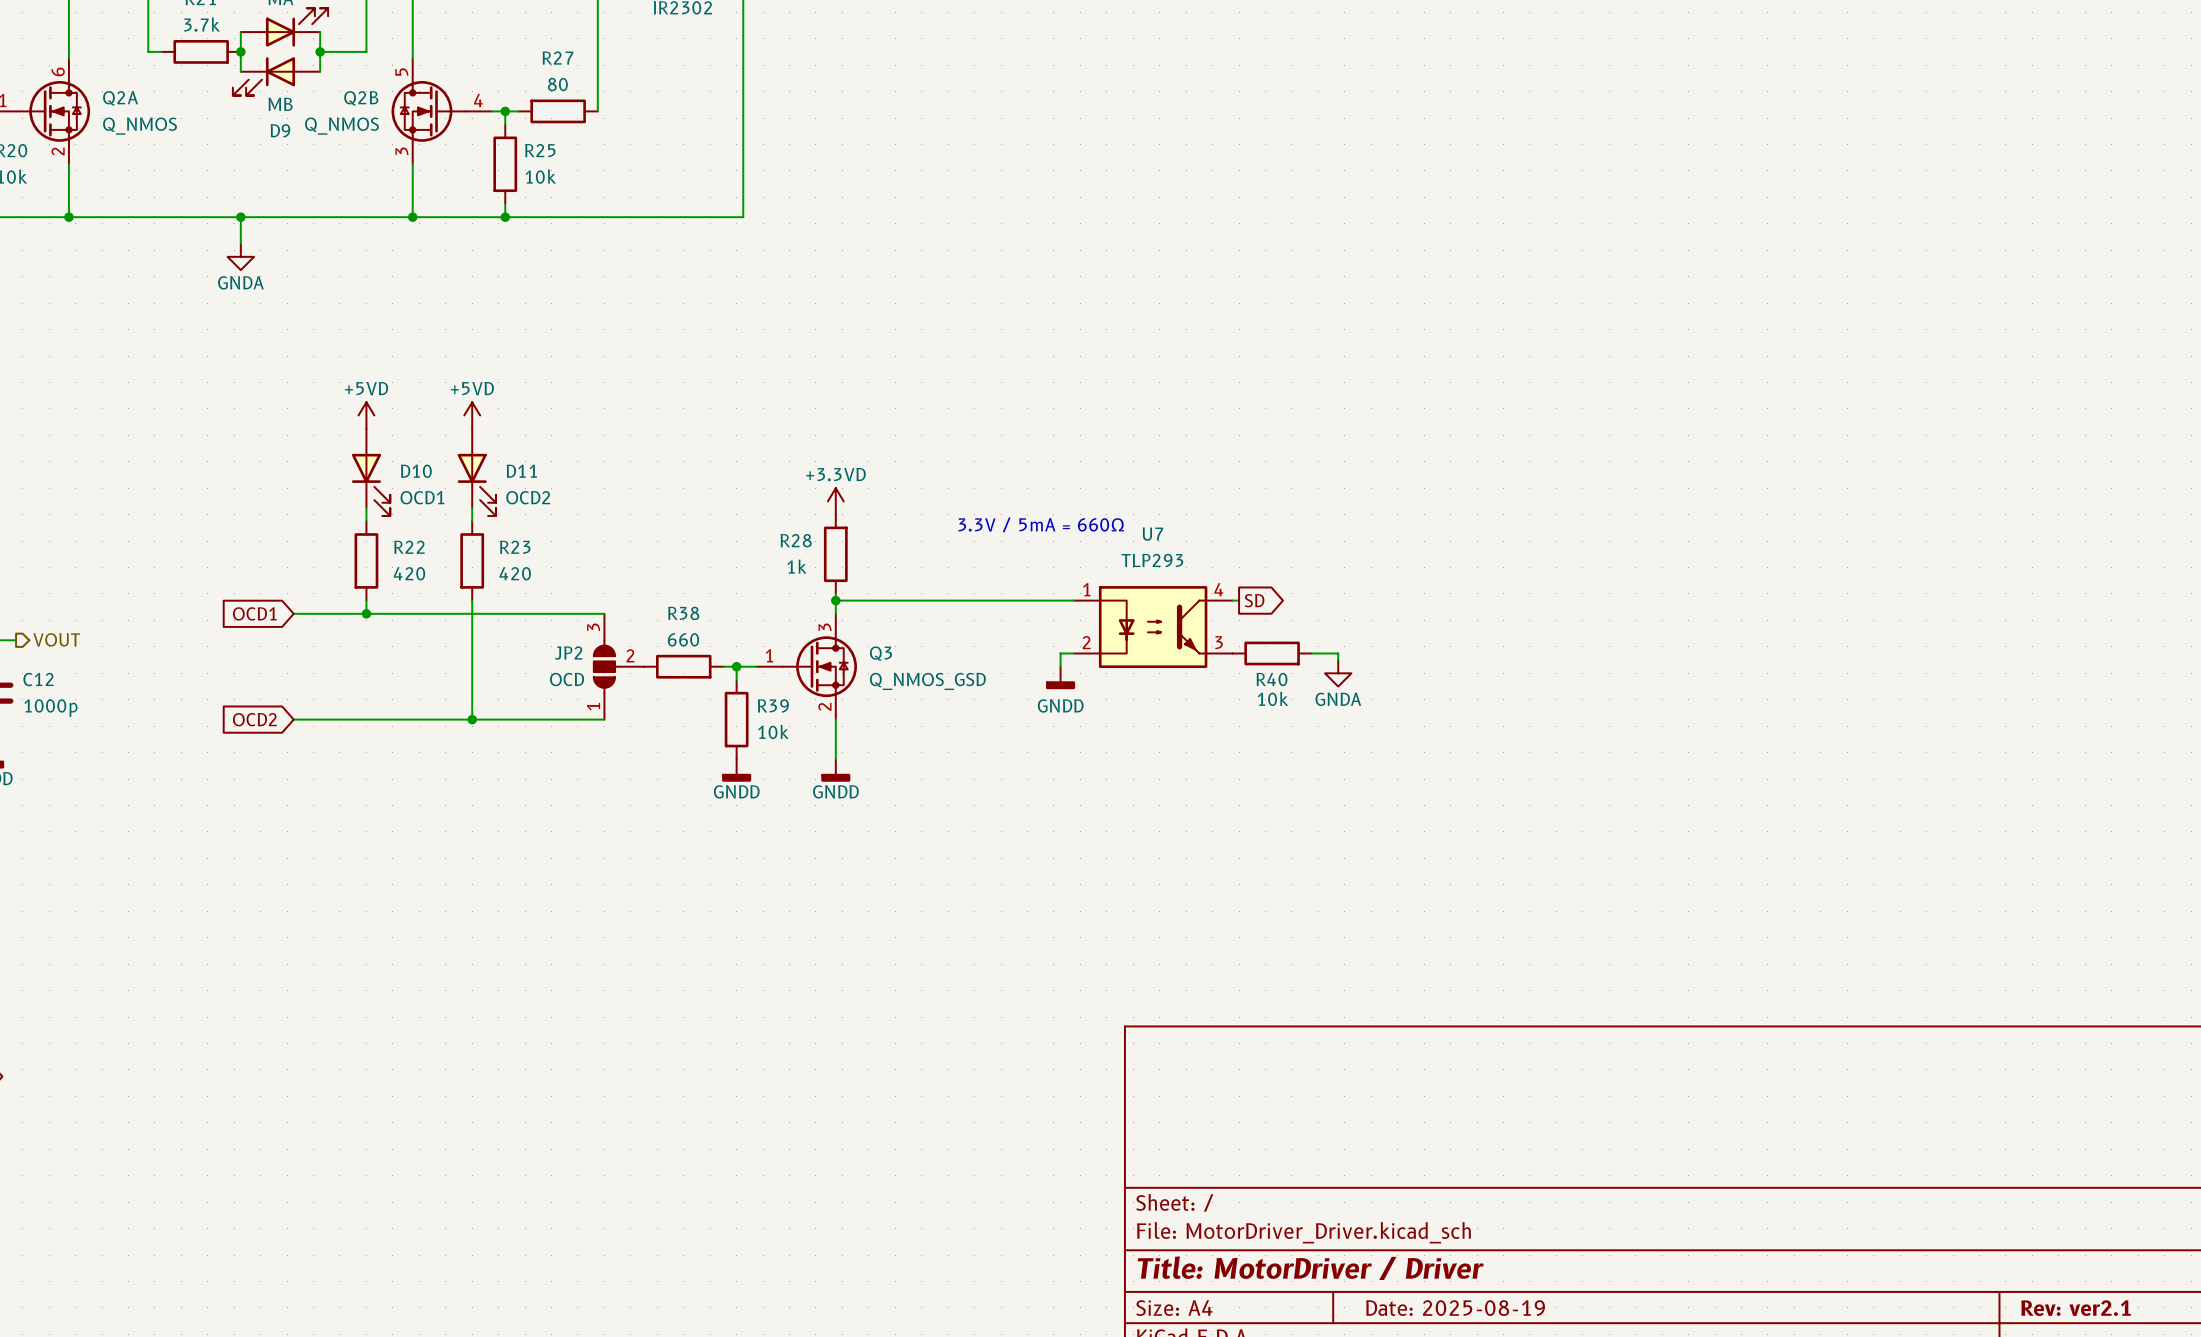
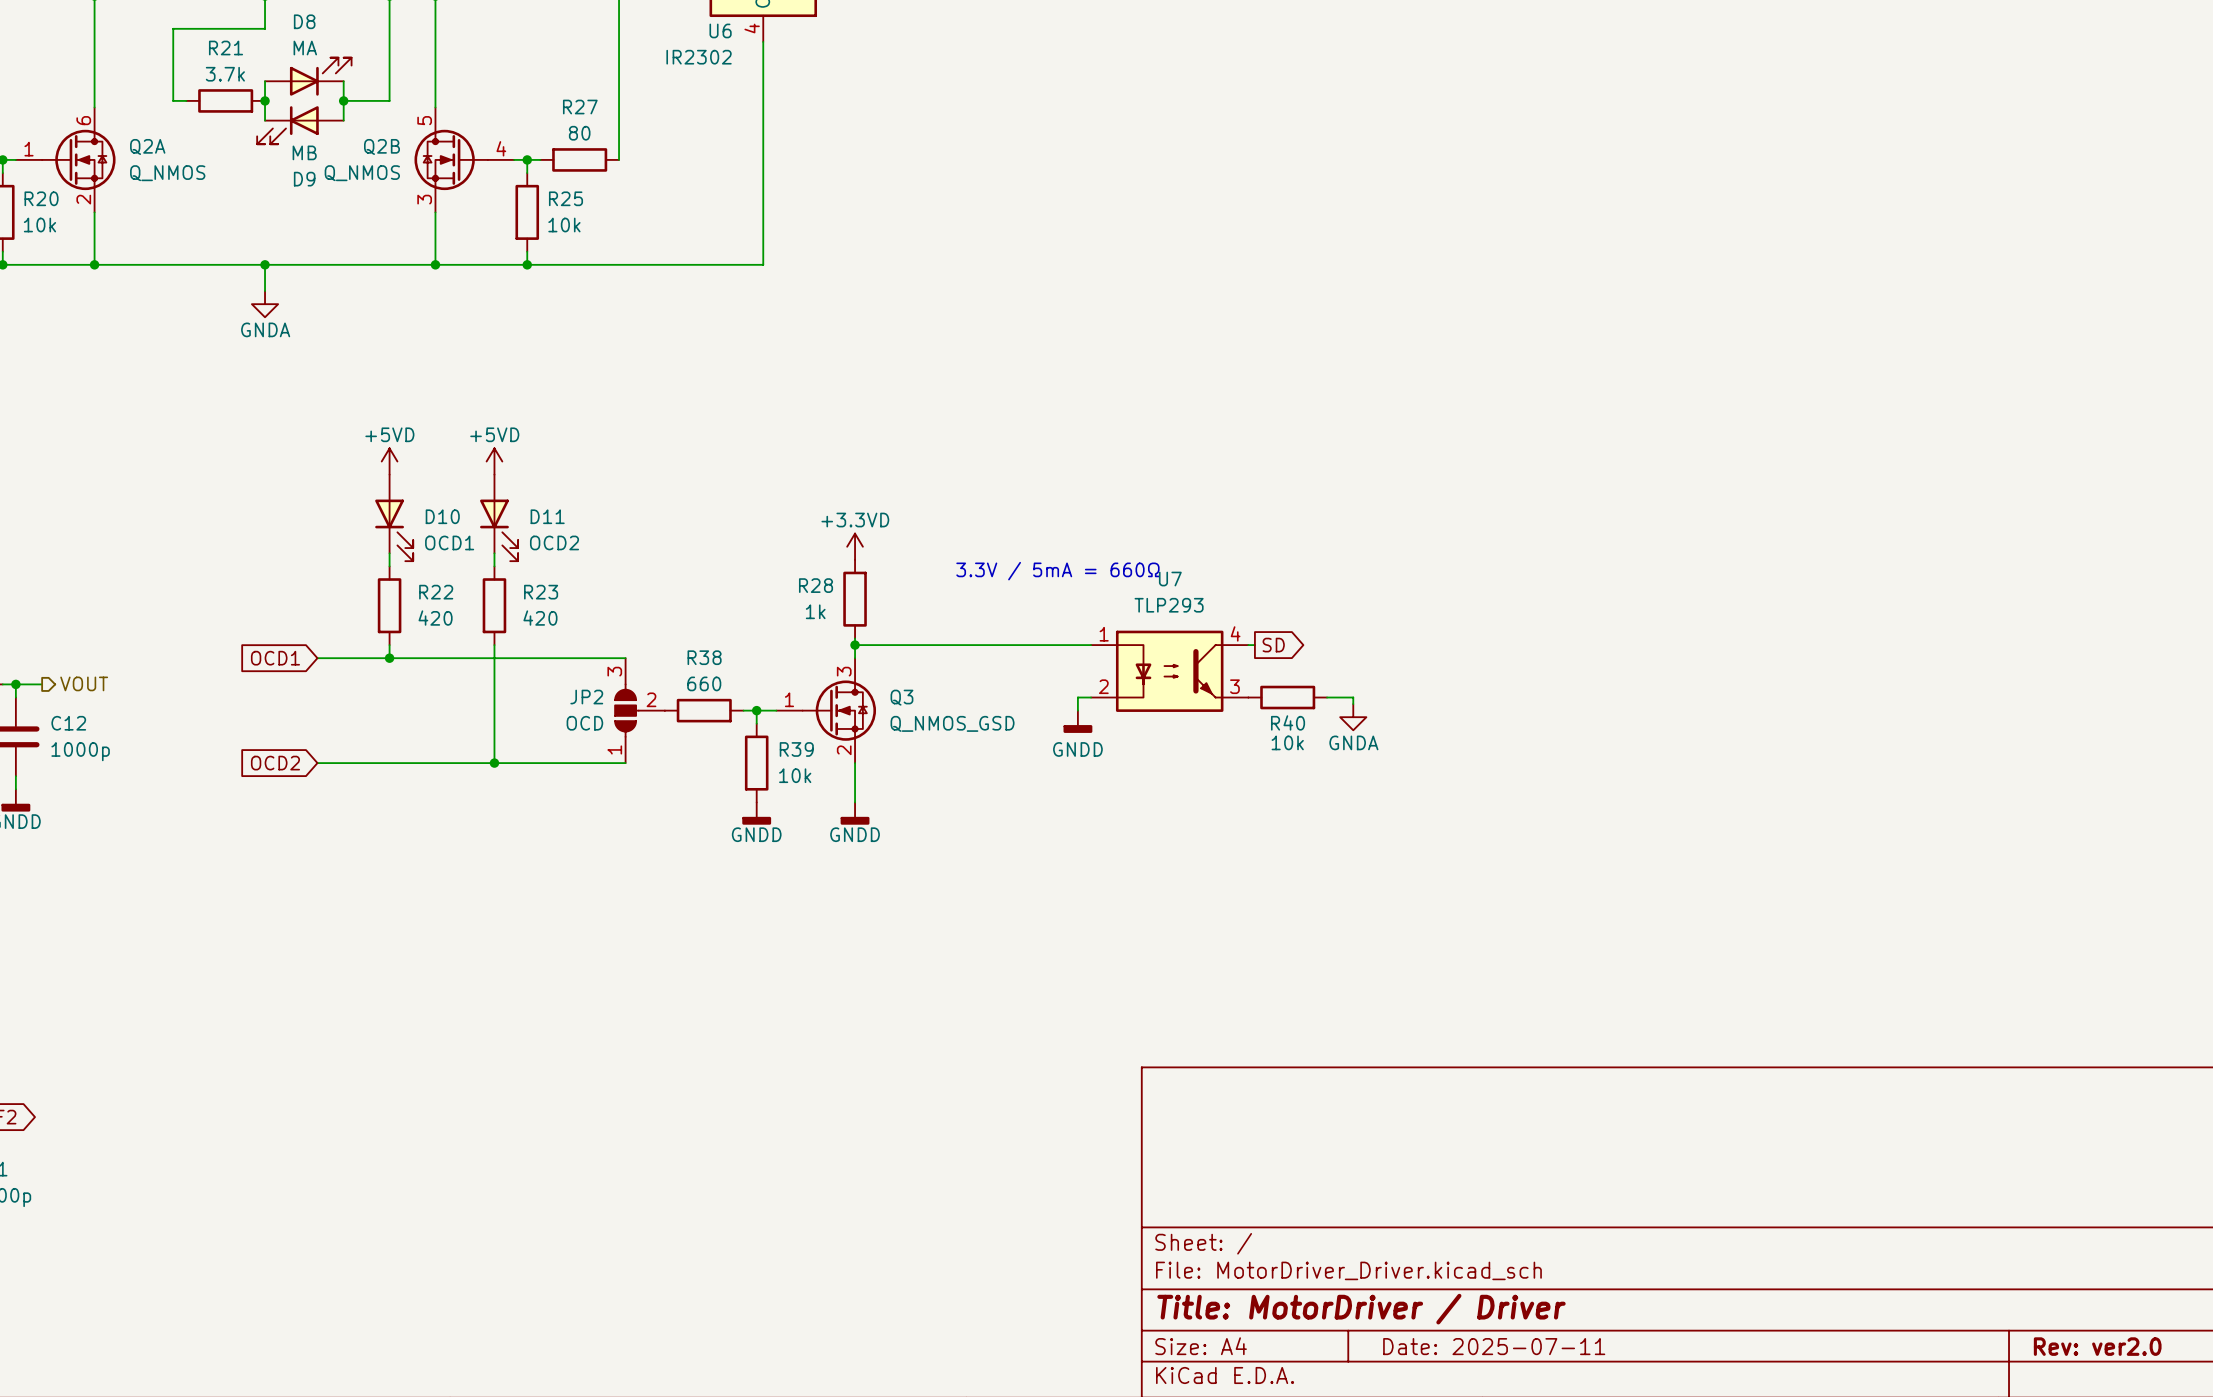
title block: Date: 2025-08-19 (1455, 1308) -> Date: 2025-07-11 (1494, 1346)
title block: Rev: ver2.1 (2075, 1308) -> Rev: ver2.0 (2097, 1346)

